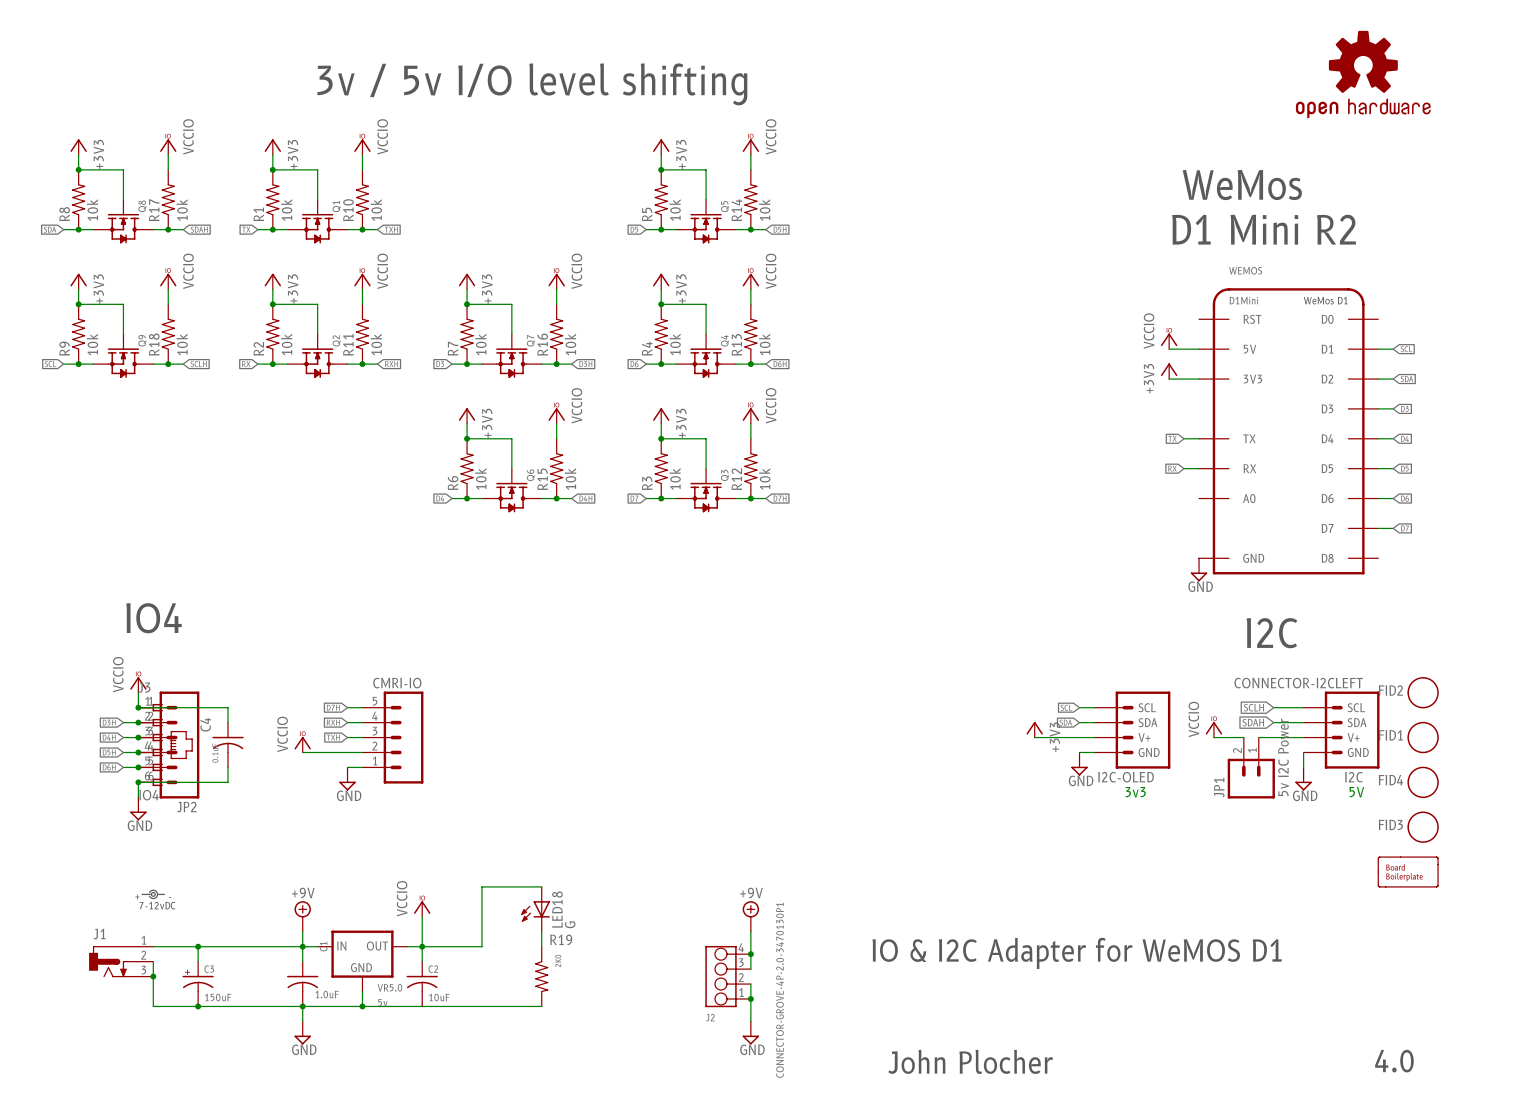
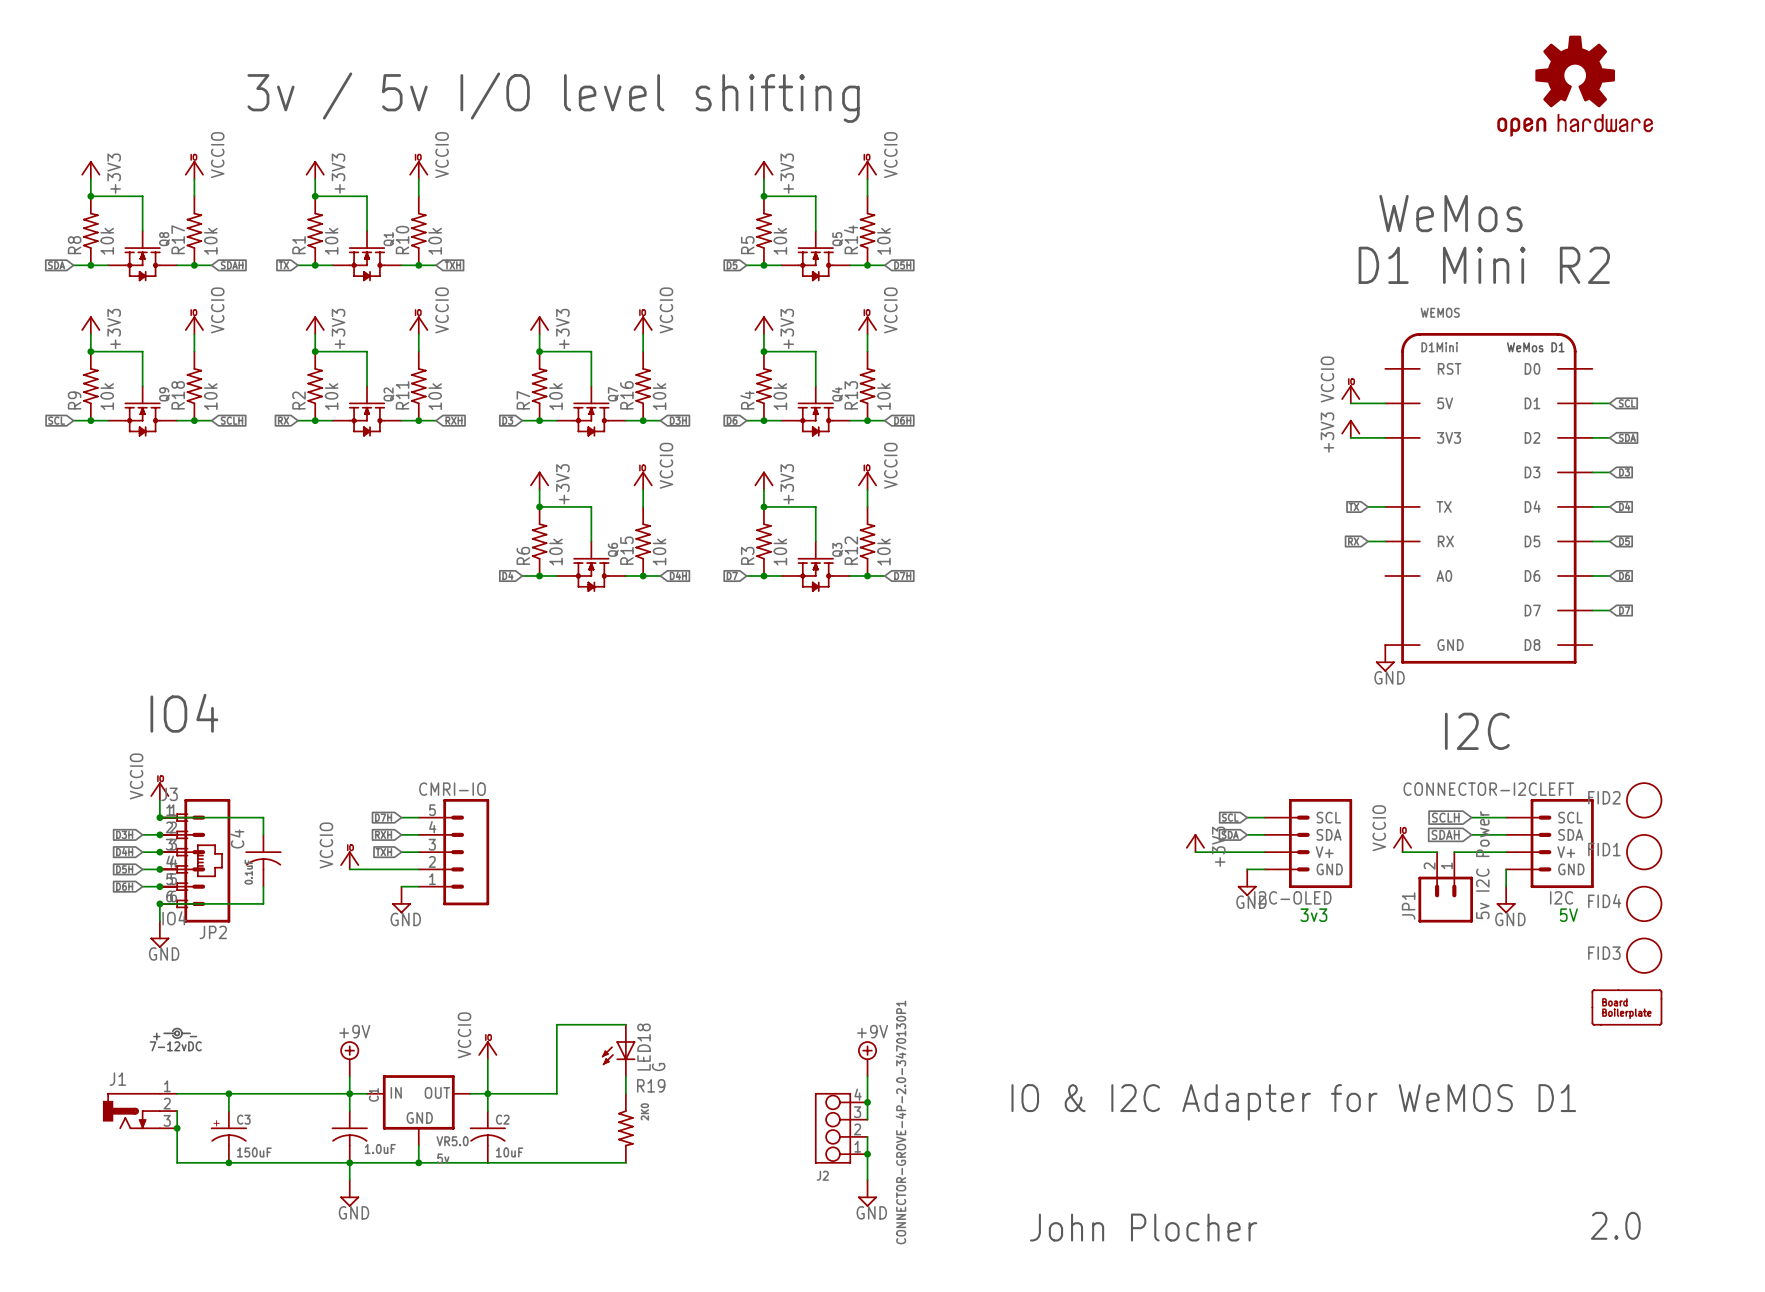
text: 4.0 (1394, 1061) -> 2.0 (1615, 1225)

